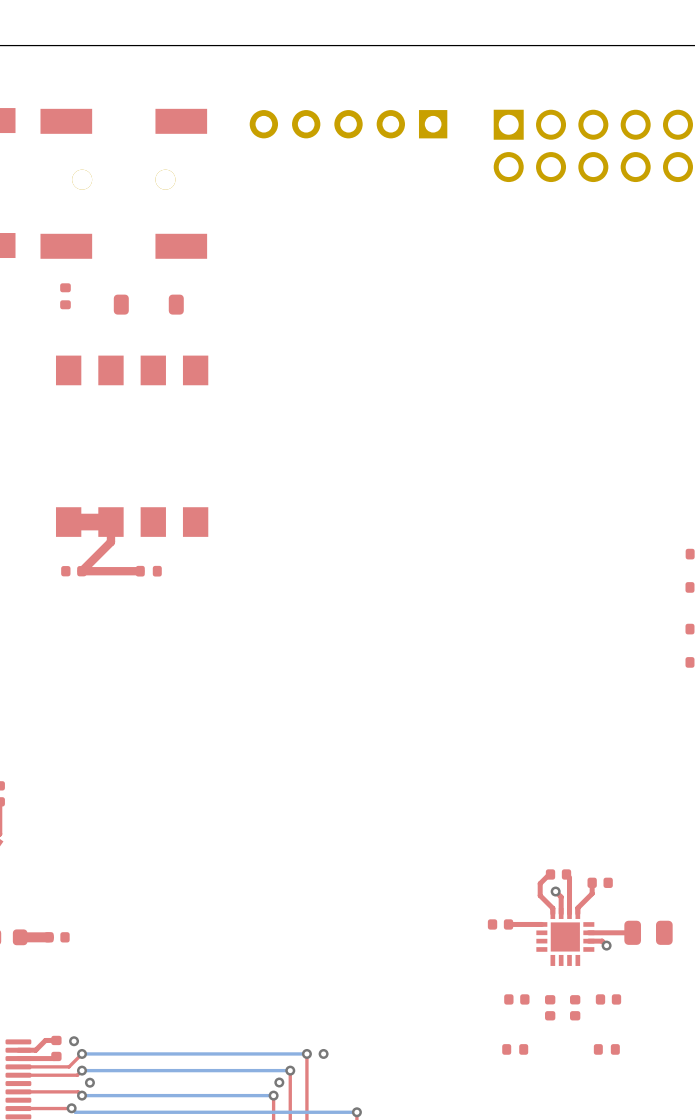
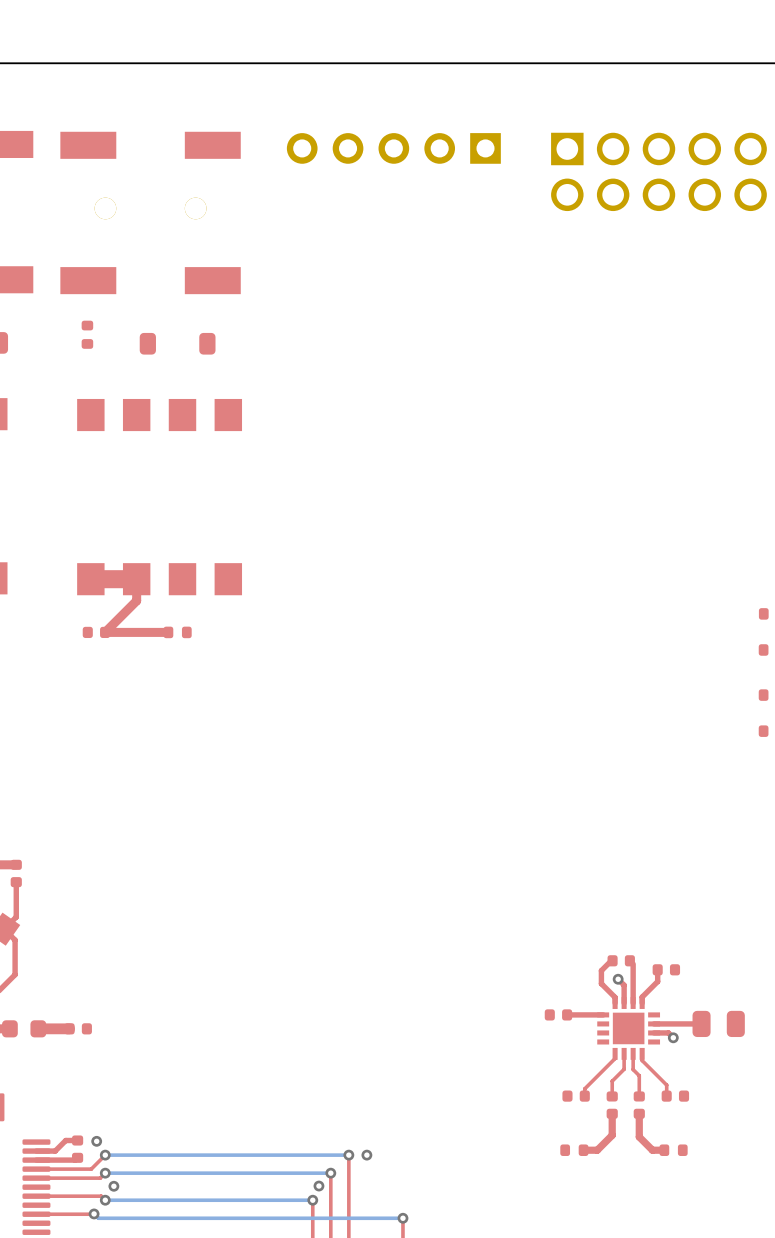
top track: none -> (615, 1053) (615, 1058) (584, 1088) (584, 1096)
top track: none -> (624, 1053) (624, 1069) (612, 1081) (612, 1096)
top track: none -> (633, 1053) (633, 1069) (639, 1075) (639, 1096)
top track: none -> (642, 1053) (642, 1060) (666, 1085) (666, 1096)
top track: none -> (612, 1113) (612, 1135) (597, 1150) (583, 1150)
top track: none -> (639, 1113) (639, 1137) (652, 1150) (664, 1150)

